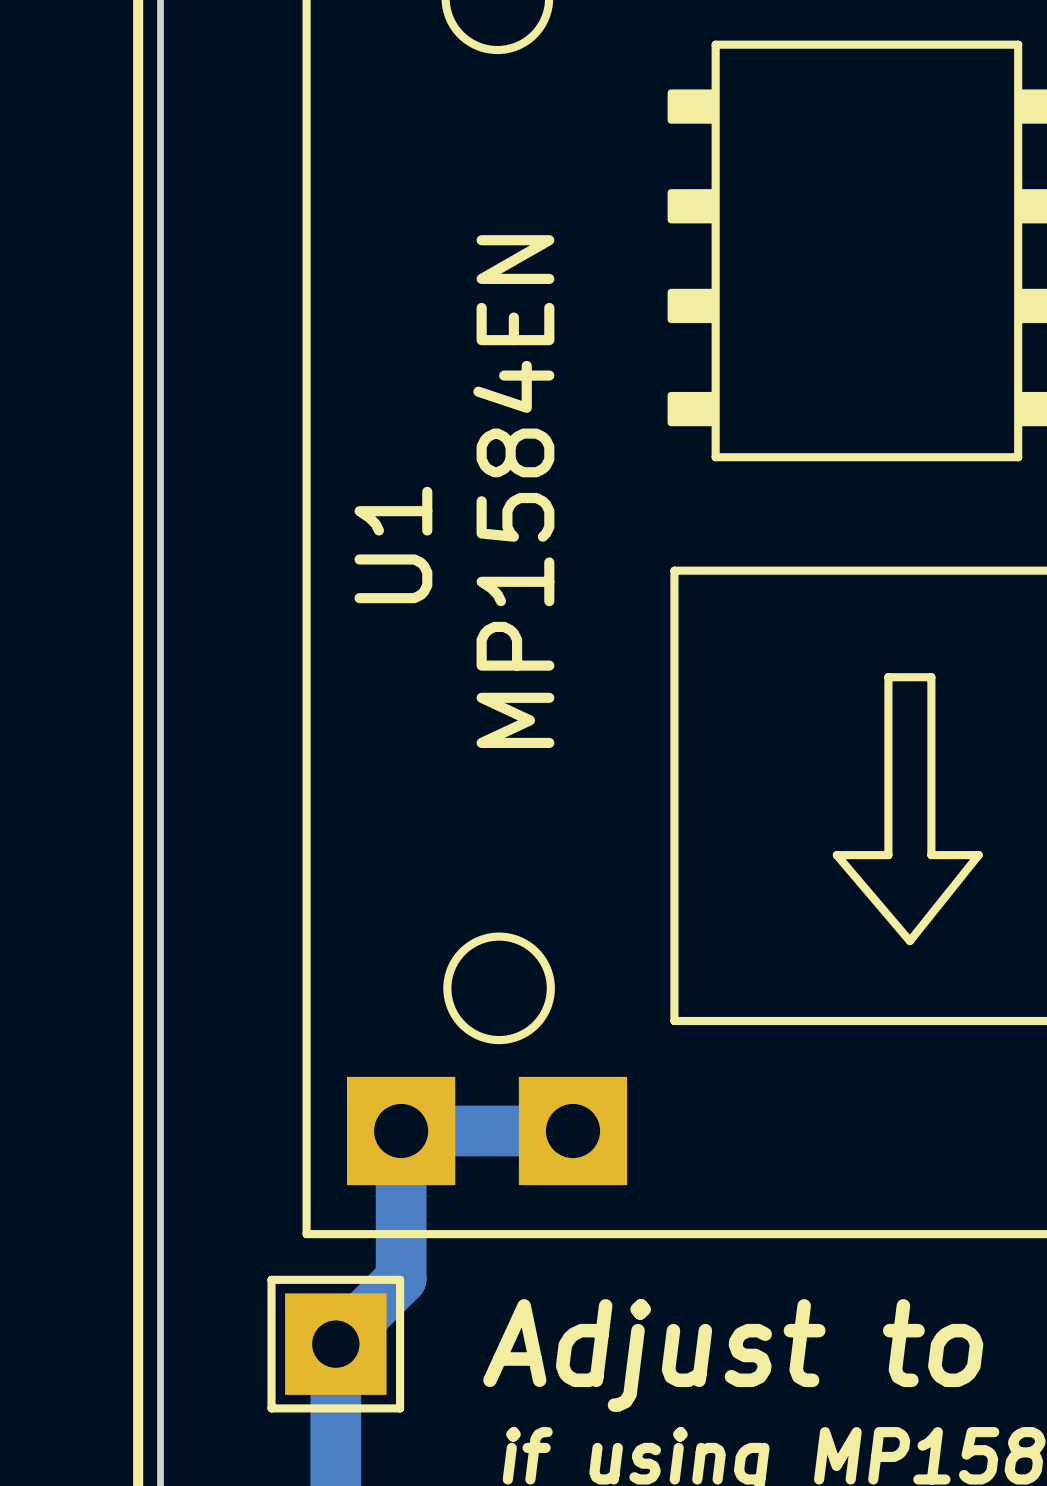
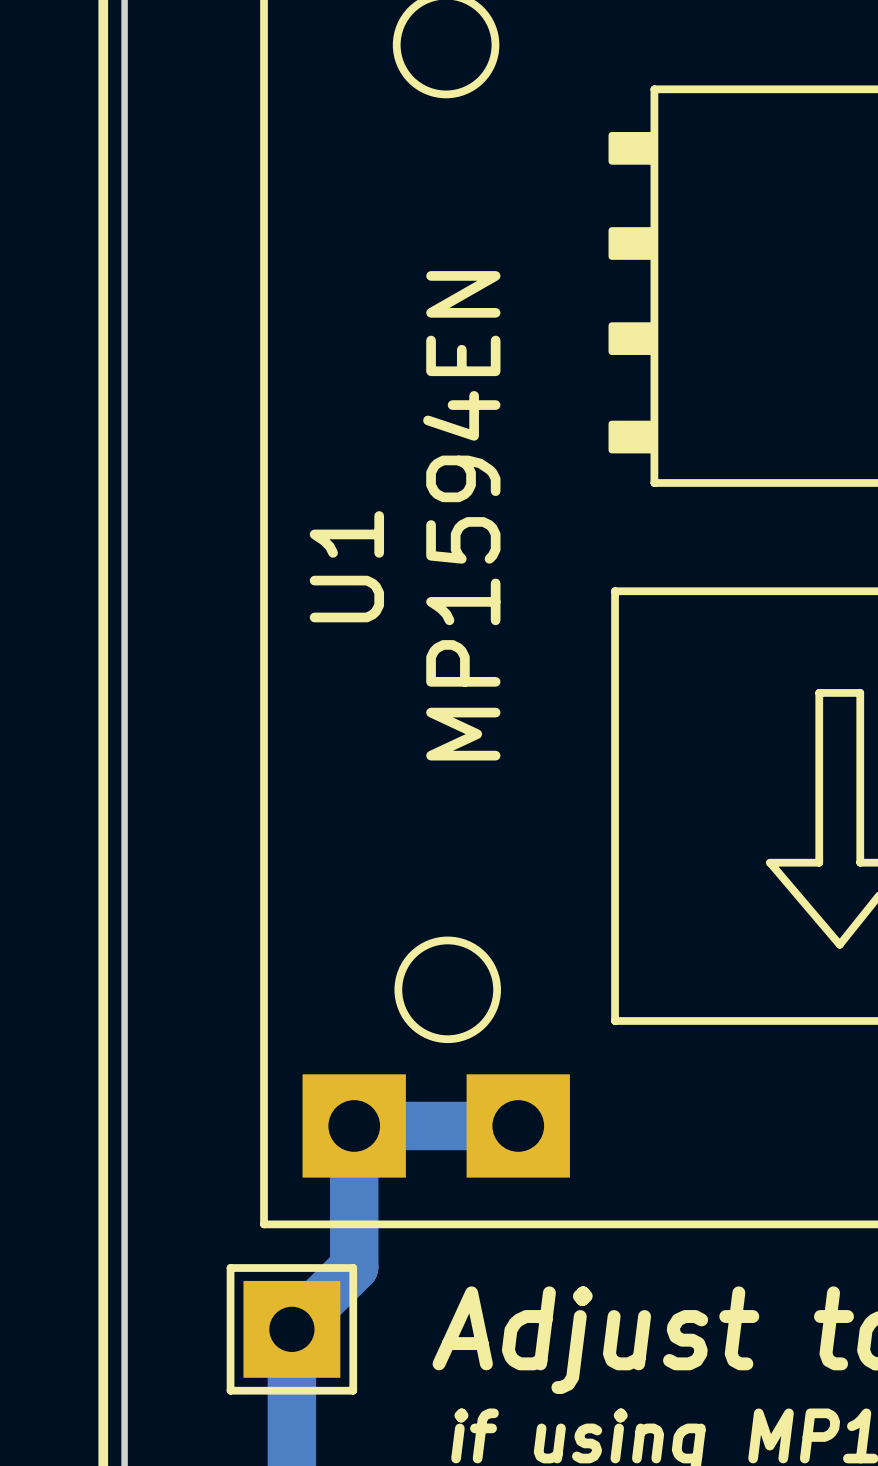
text: MP1584EN (513, 491) -> MP1594EN (461, 515)

